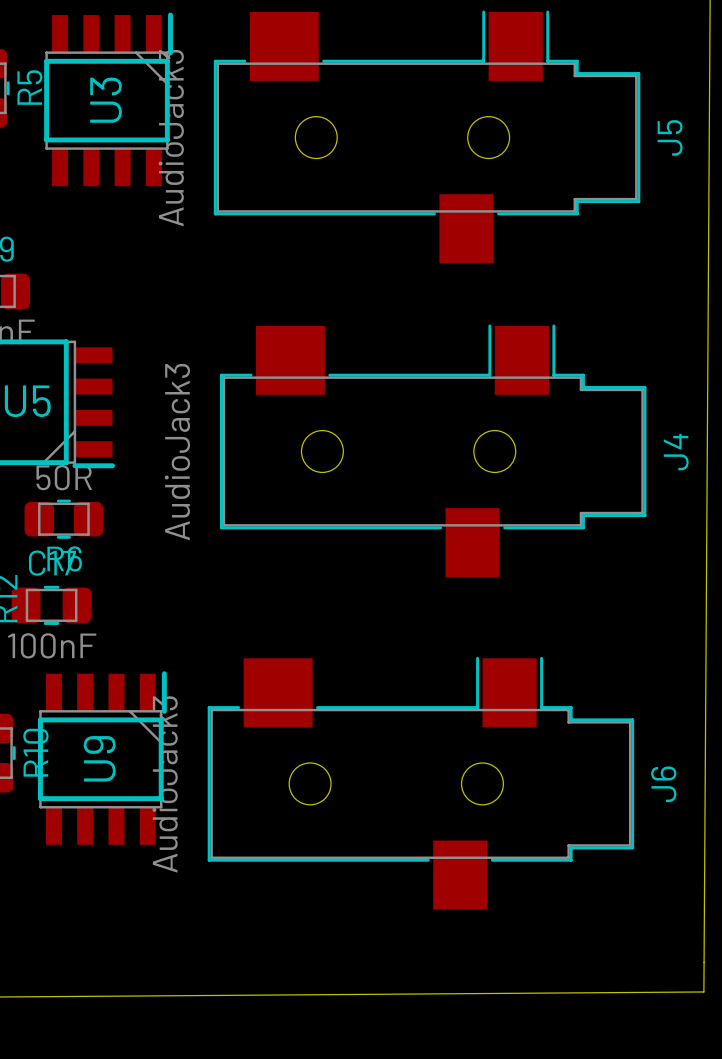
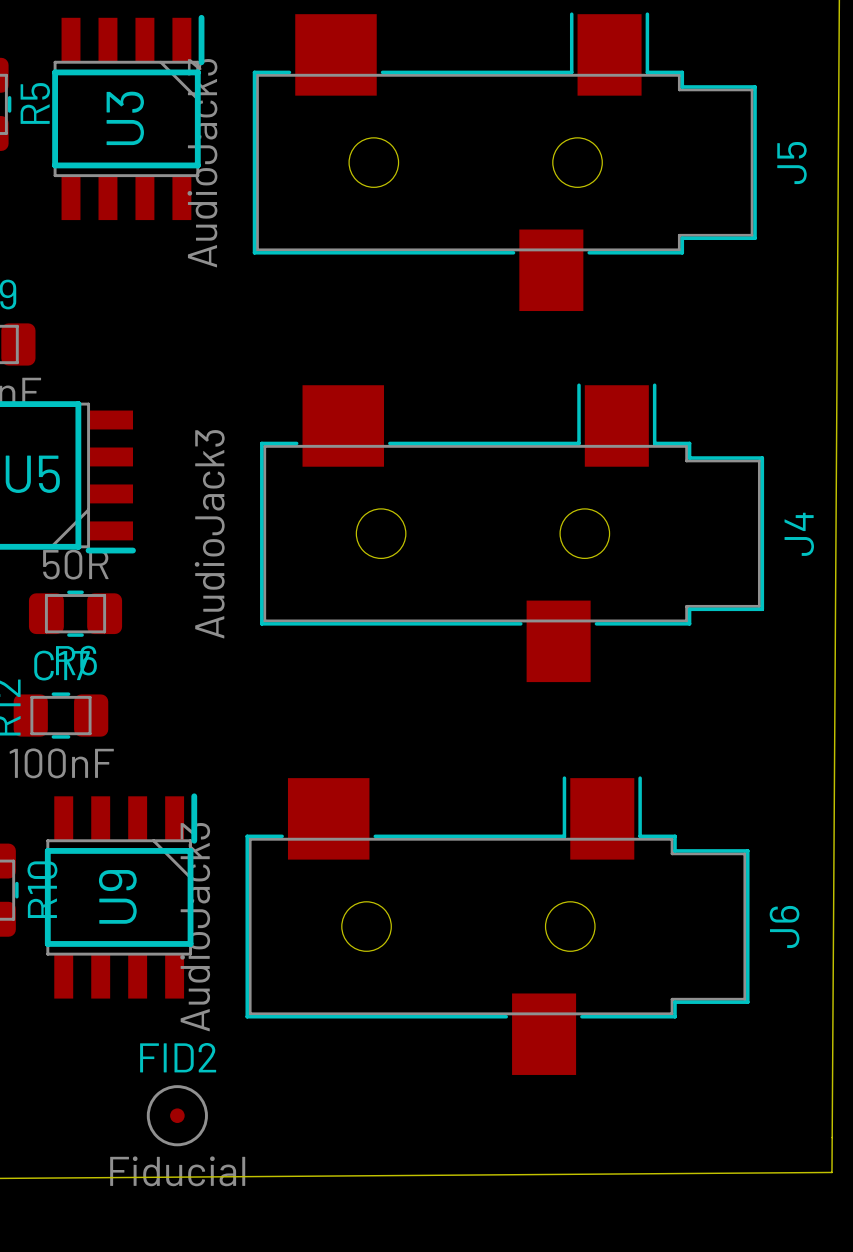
FID2: none -> Fiducial (177, 1115)

